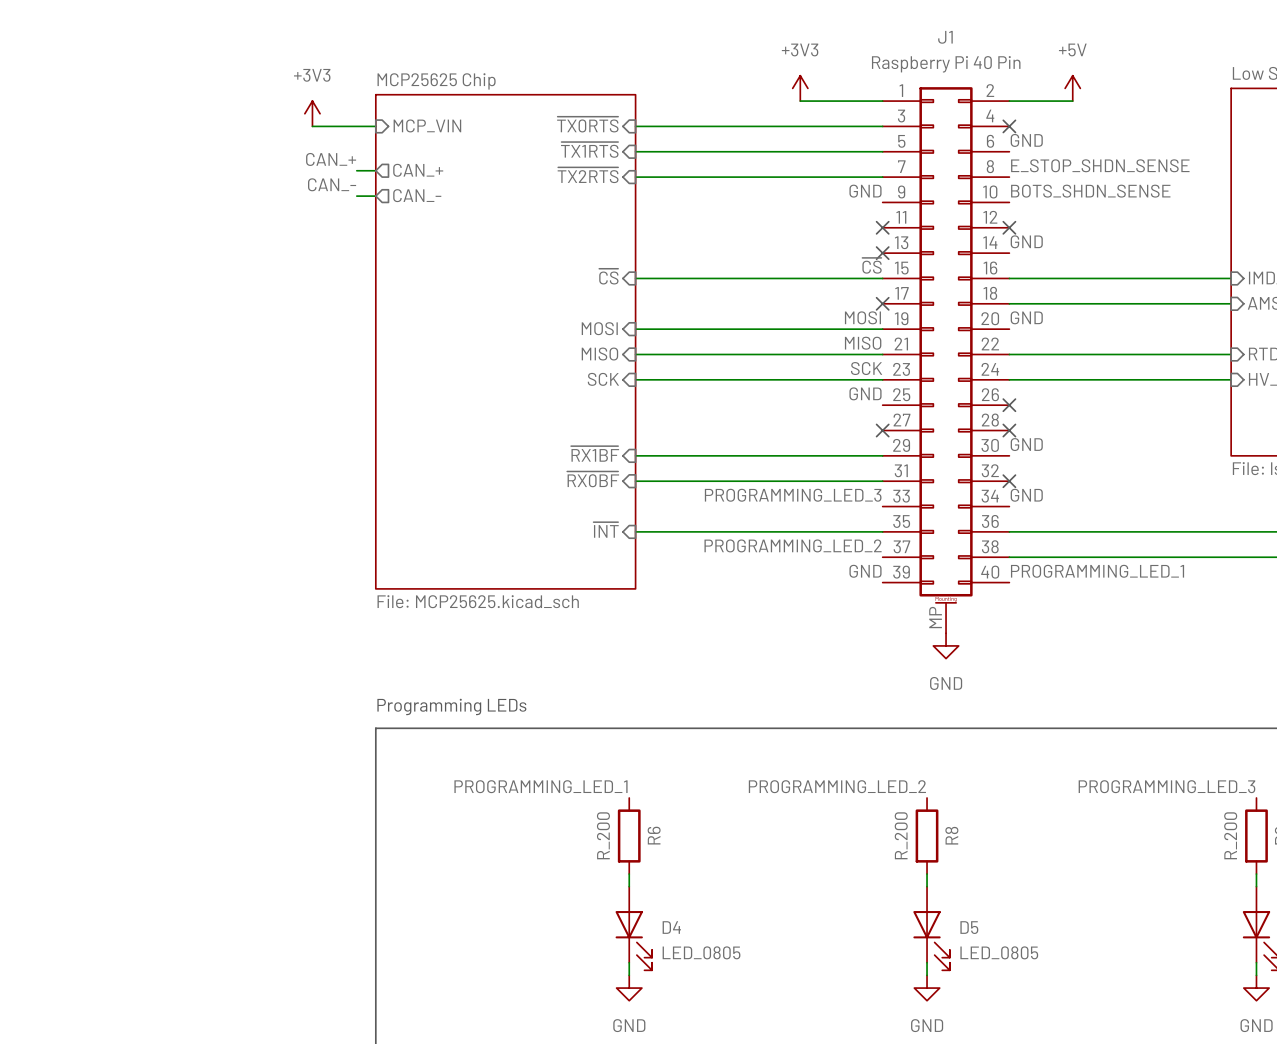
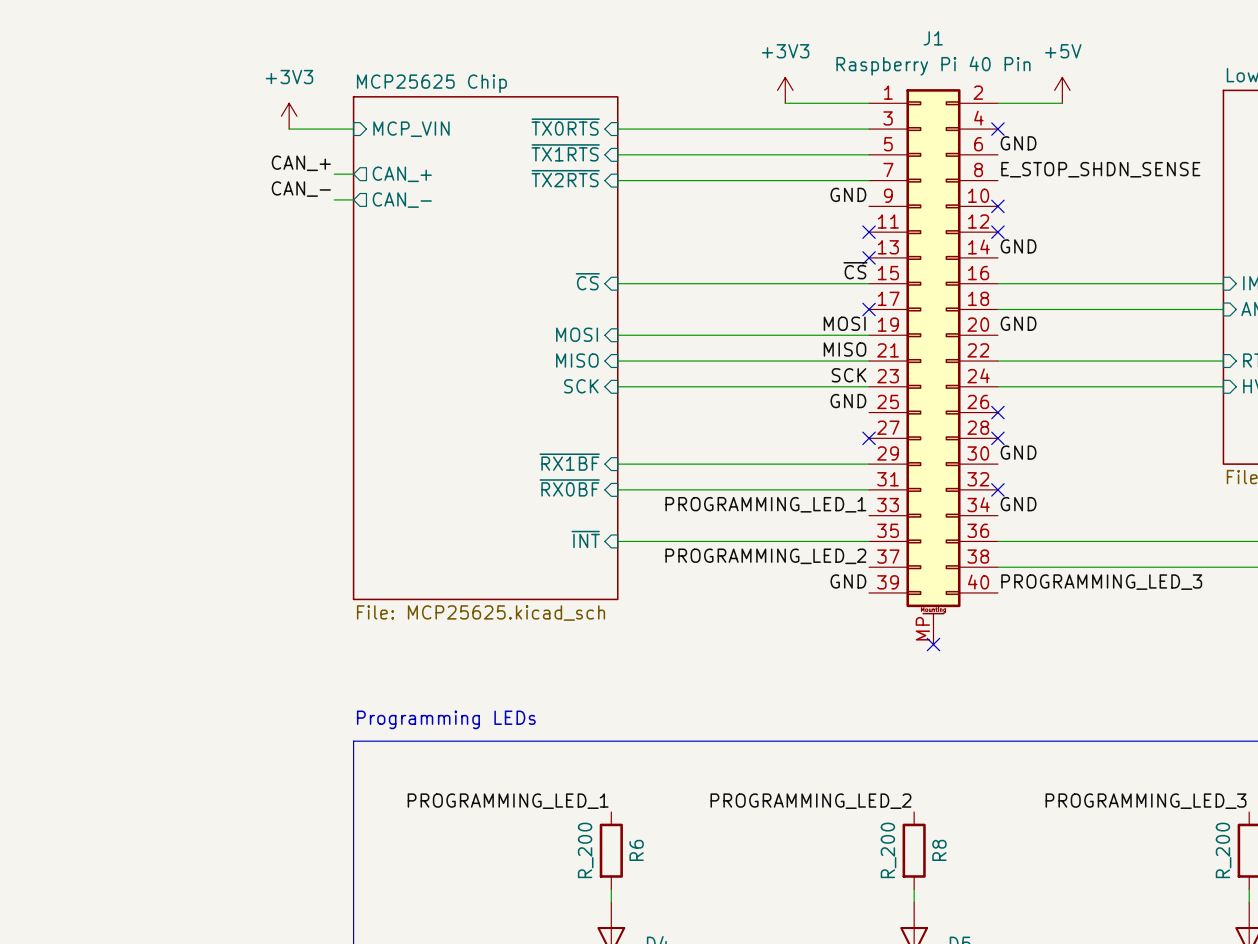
label: BOTS_SHDN_SENSE (1090, 191) -> none
no-connect mark: none -> (997, 206)
label: PROGRAMMING_LED_3 (793, 495) -> PROGRAMMING_LED_1 (765, 504)
label: PROGRAMMING_LED_1 (1097, 571) -> PROGRAMMING_LED_3 (1101, 582)
no-connect mark: none -> (933, 644)
power symbol: GND (946, 645) -> none

